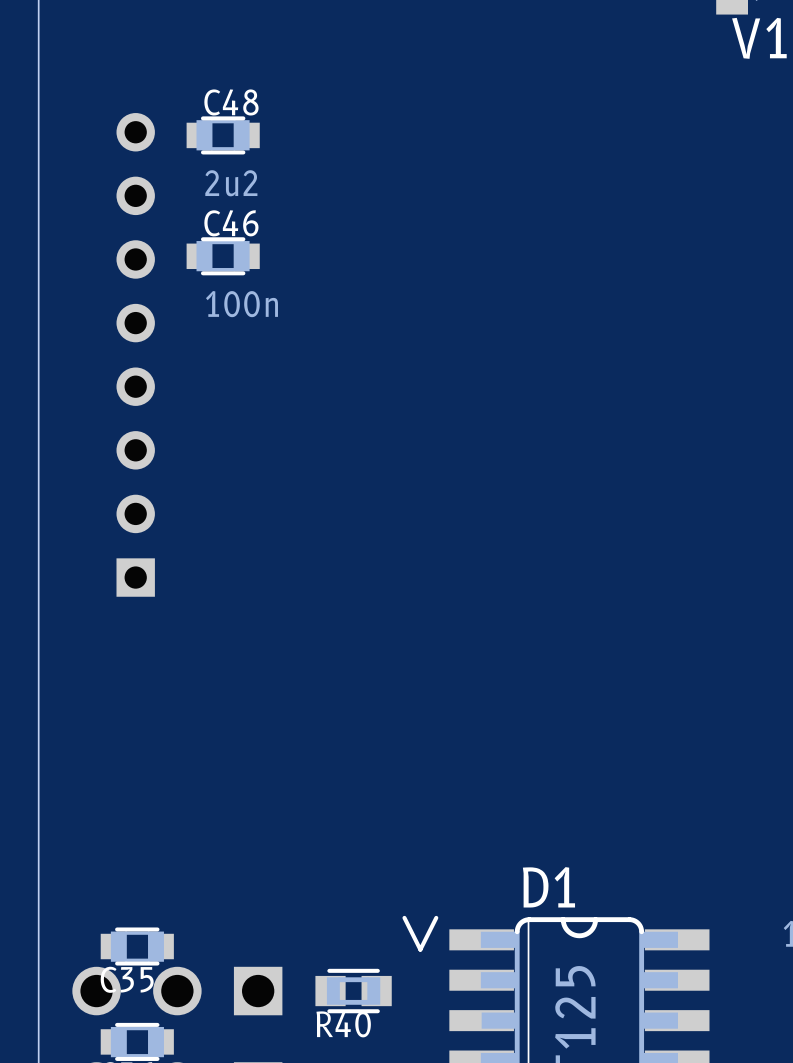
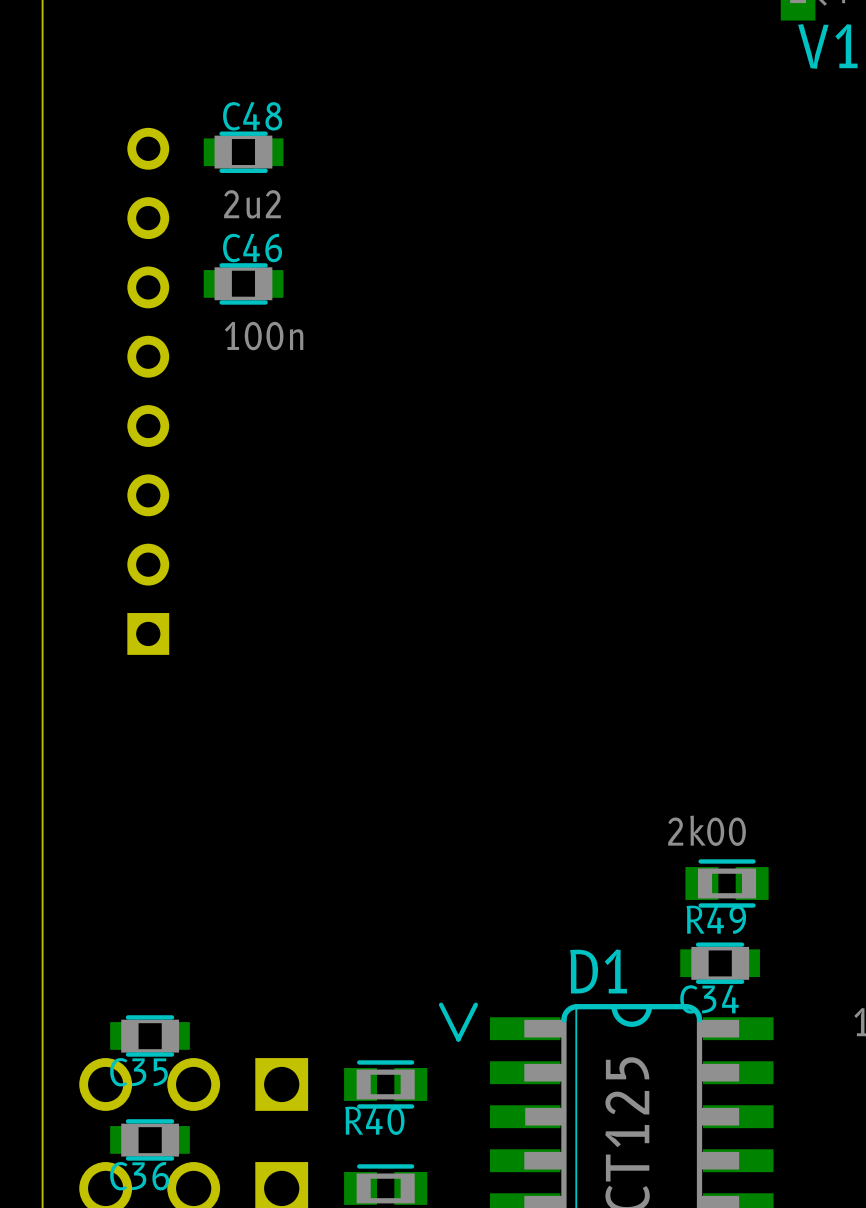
R49: none -> 2k00 (727, 883)
C34: none -> (720, 963)

